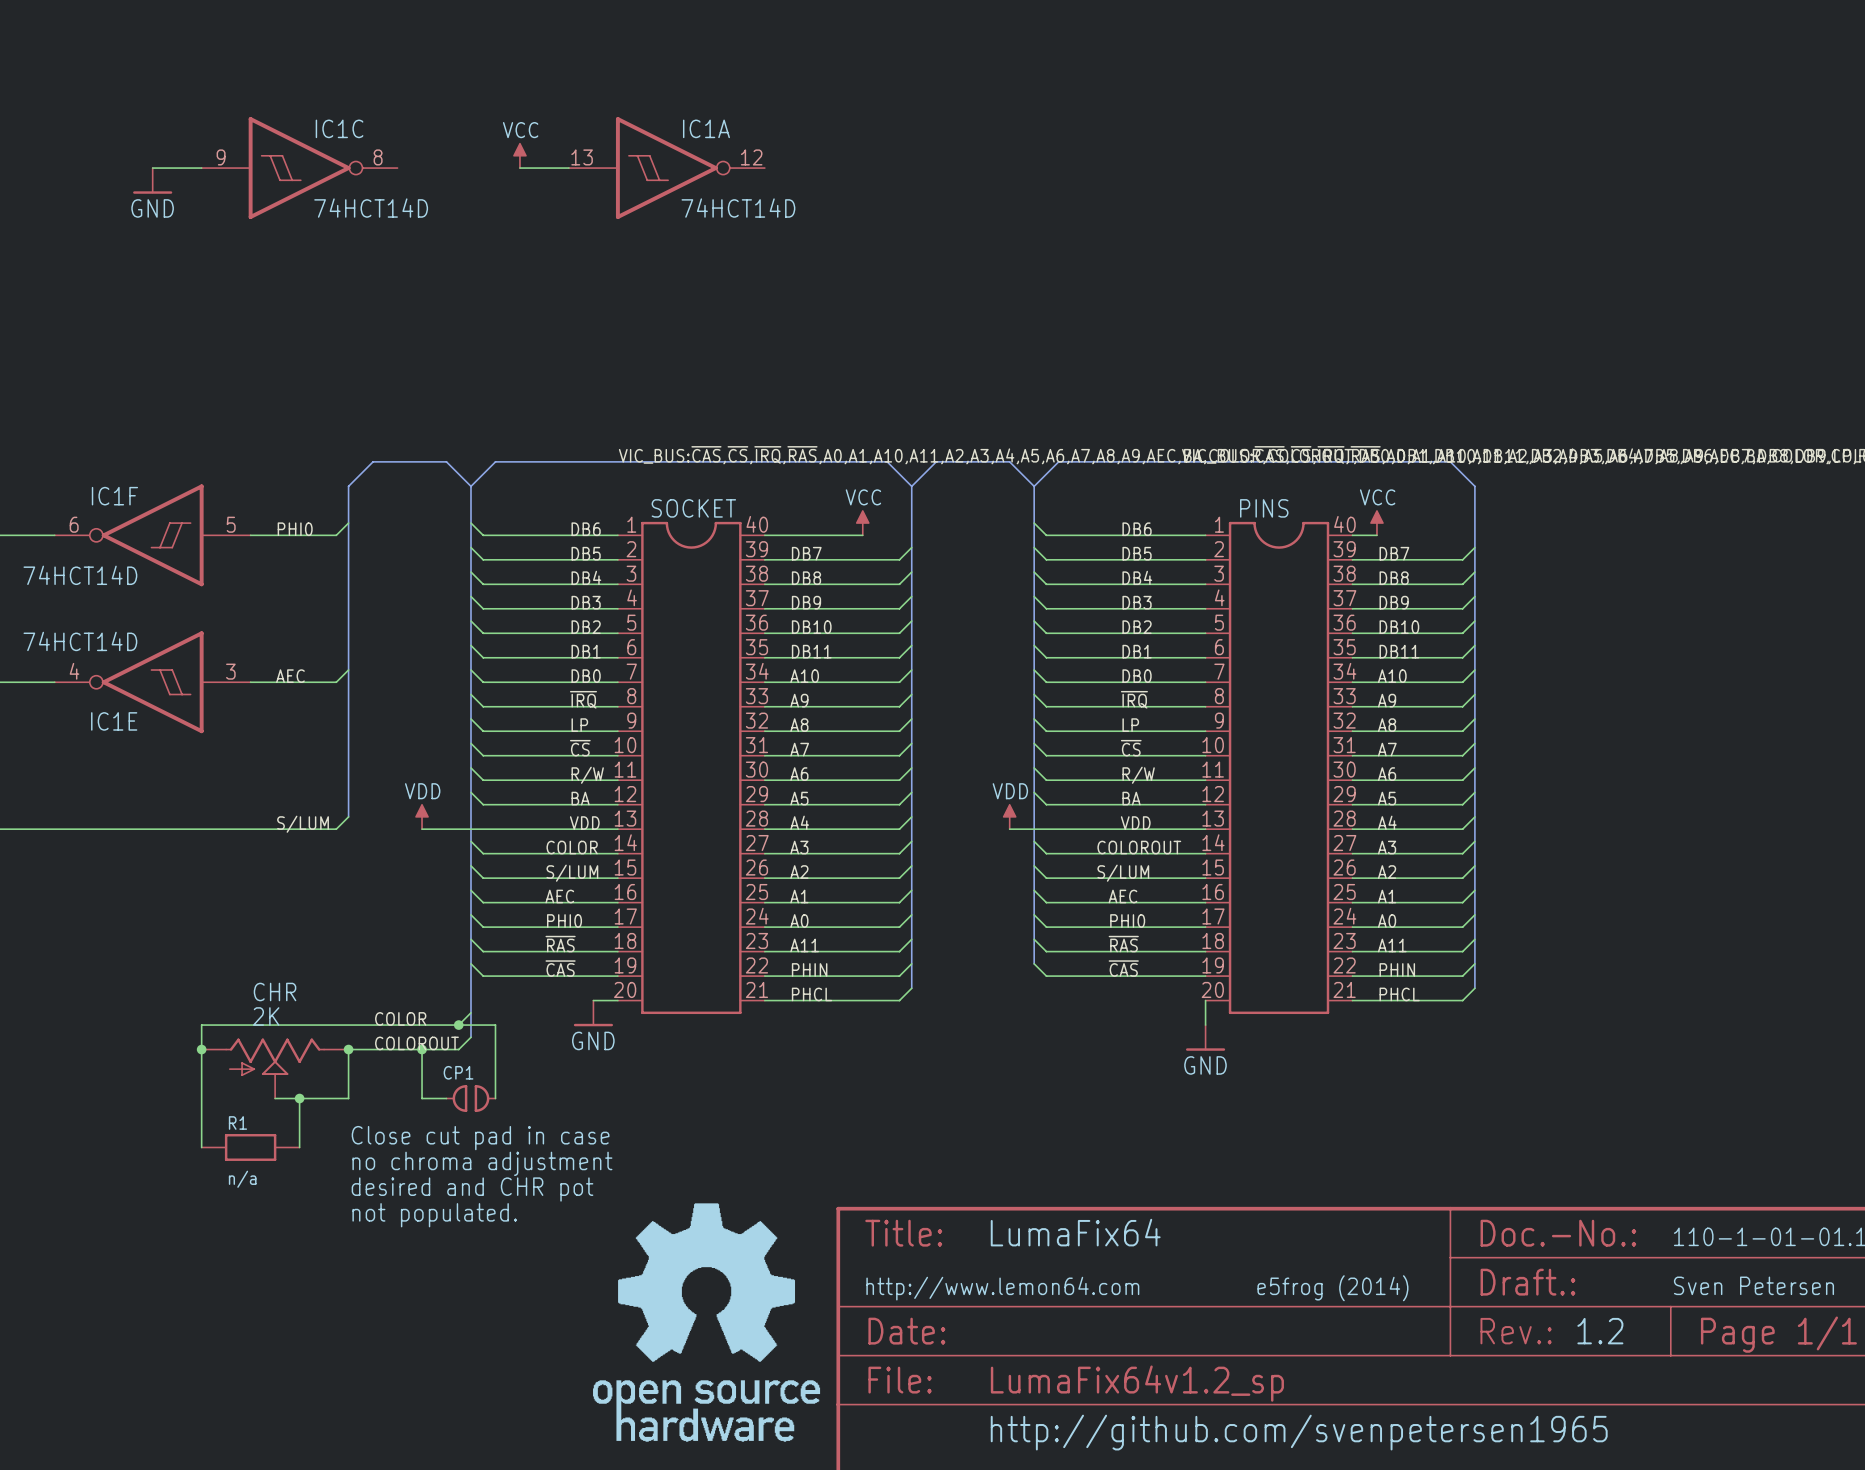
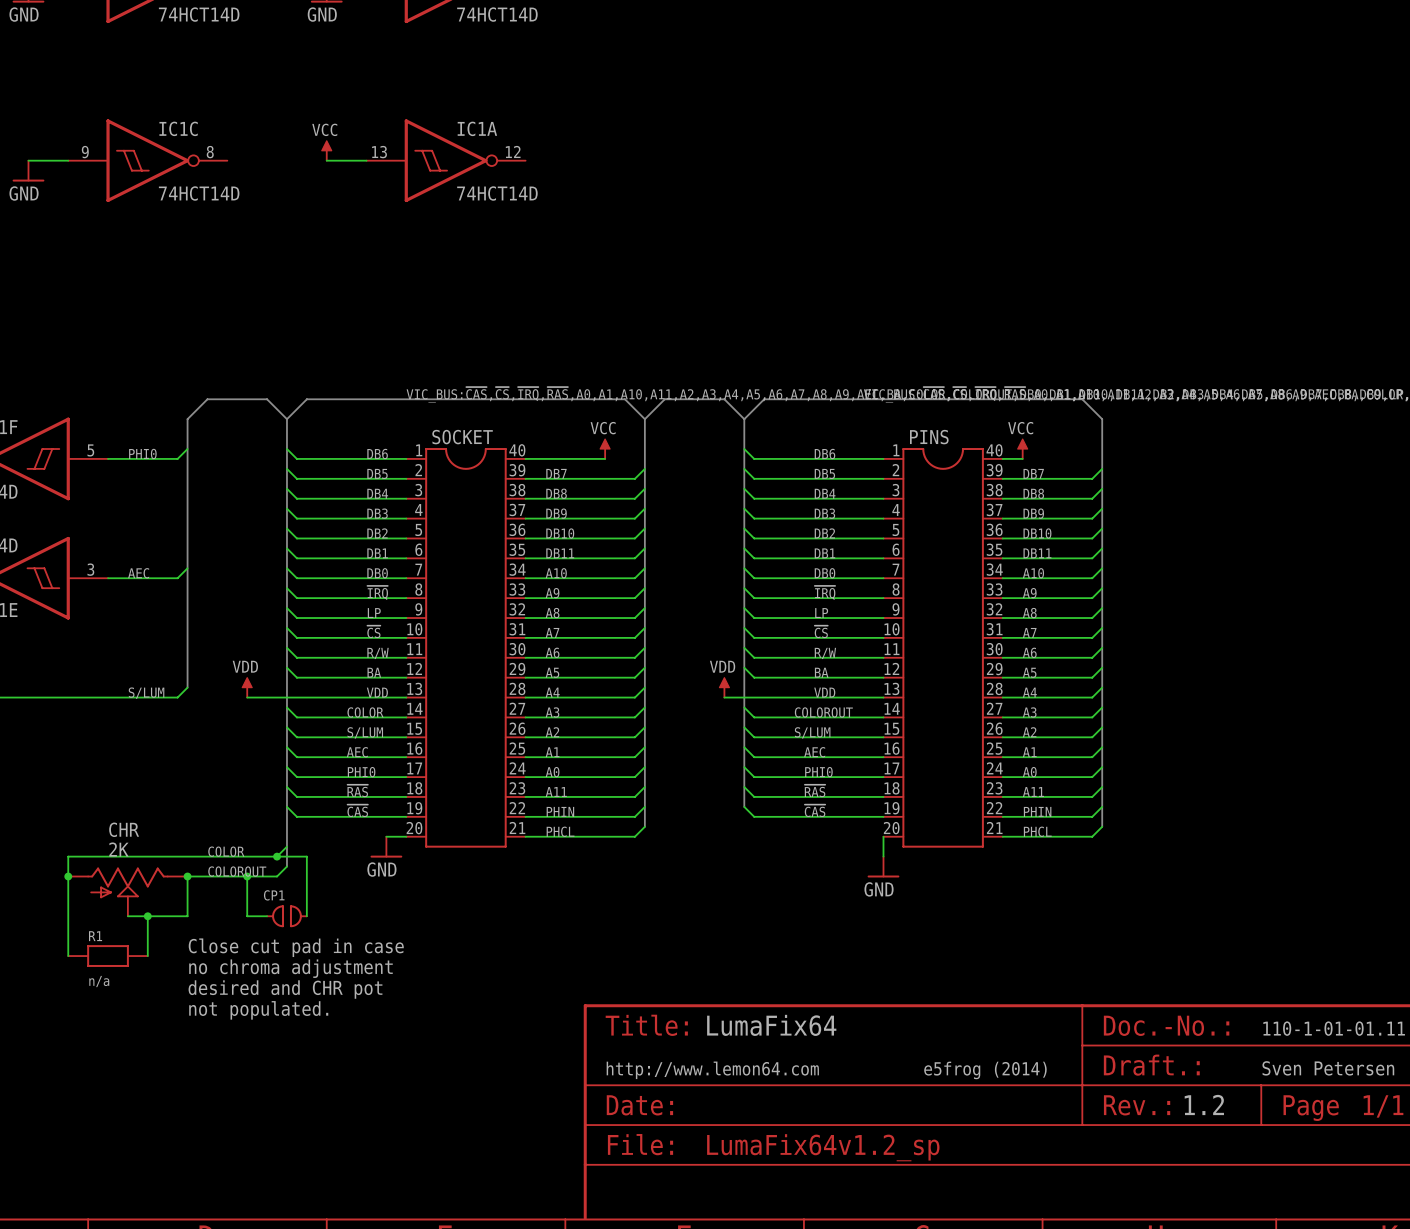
part: (706, 1322) -> none
text: http://github.com/svenpetersen1965 (1299, 1432) -> none

